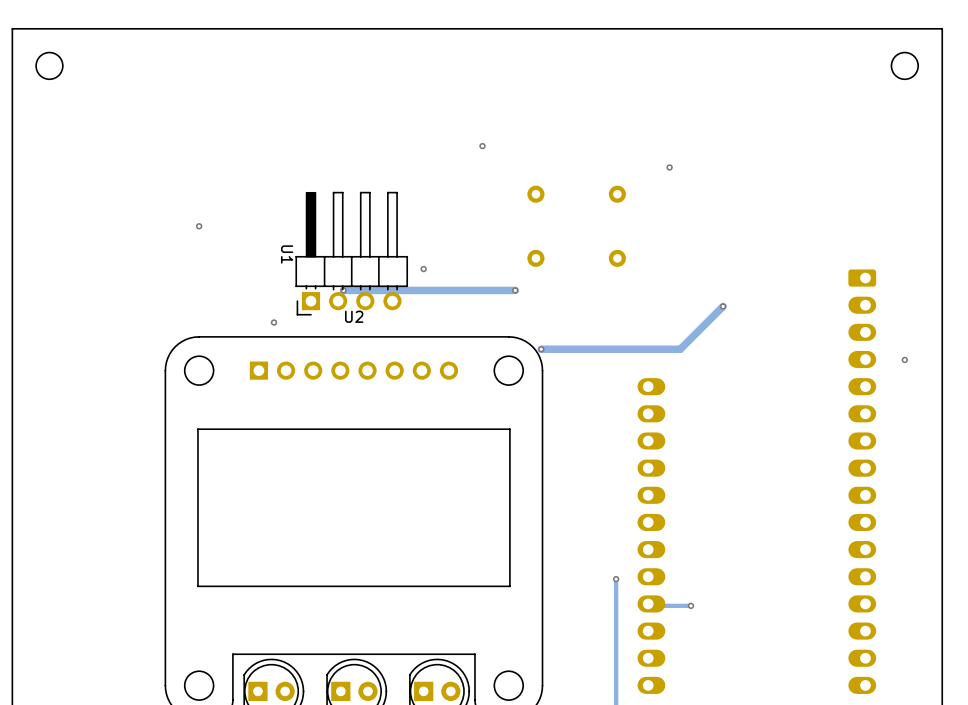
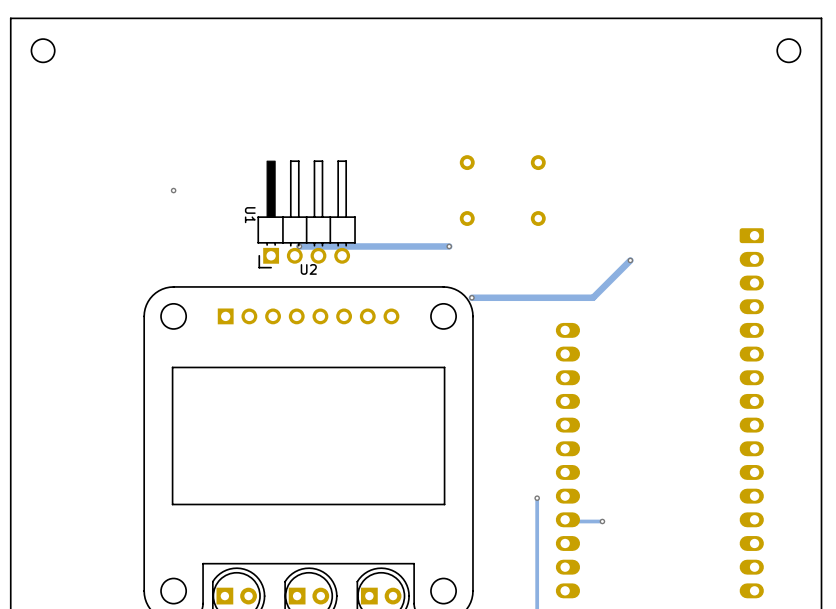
via: (482, 146) -> none
via: (669, 167) -> none
via: (423, 269) -> none
via: (274, 322) -> none
via: (904, 359) -> none

